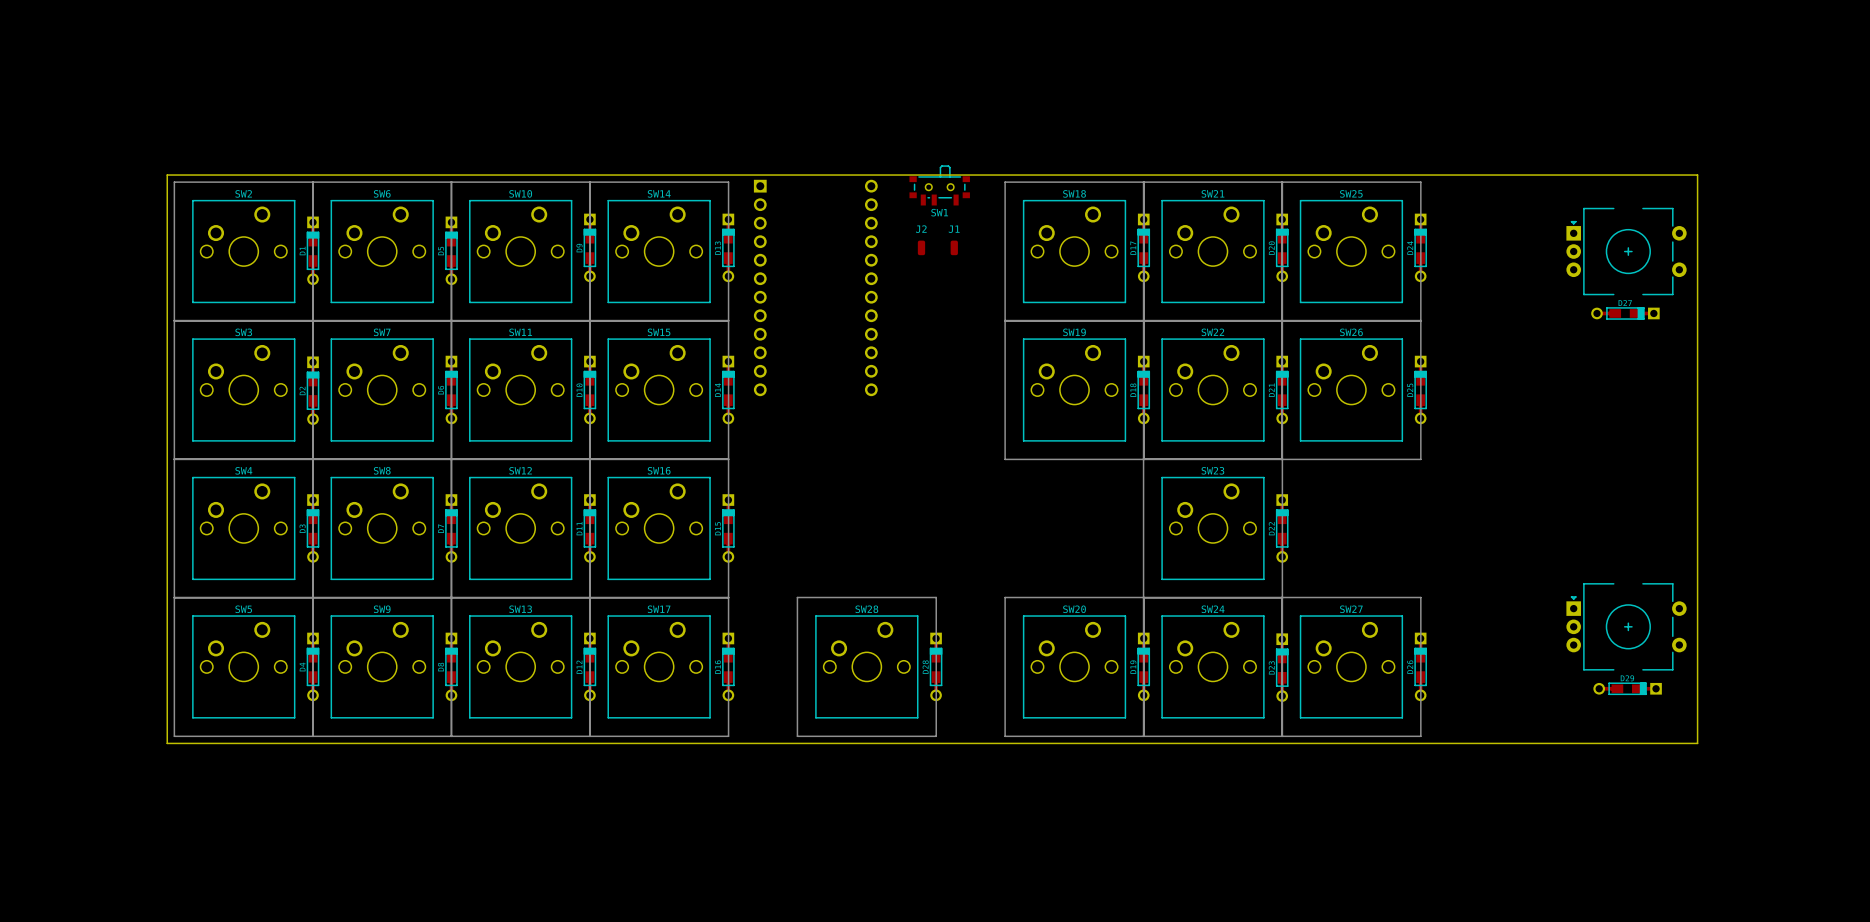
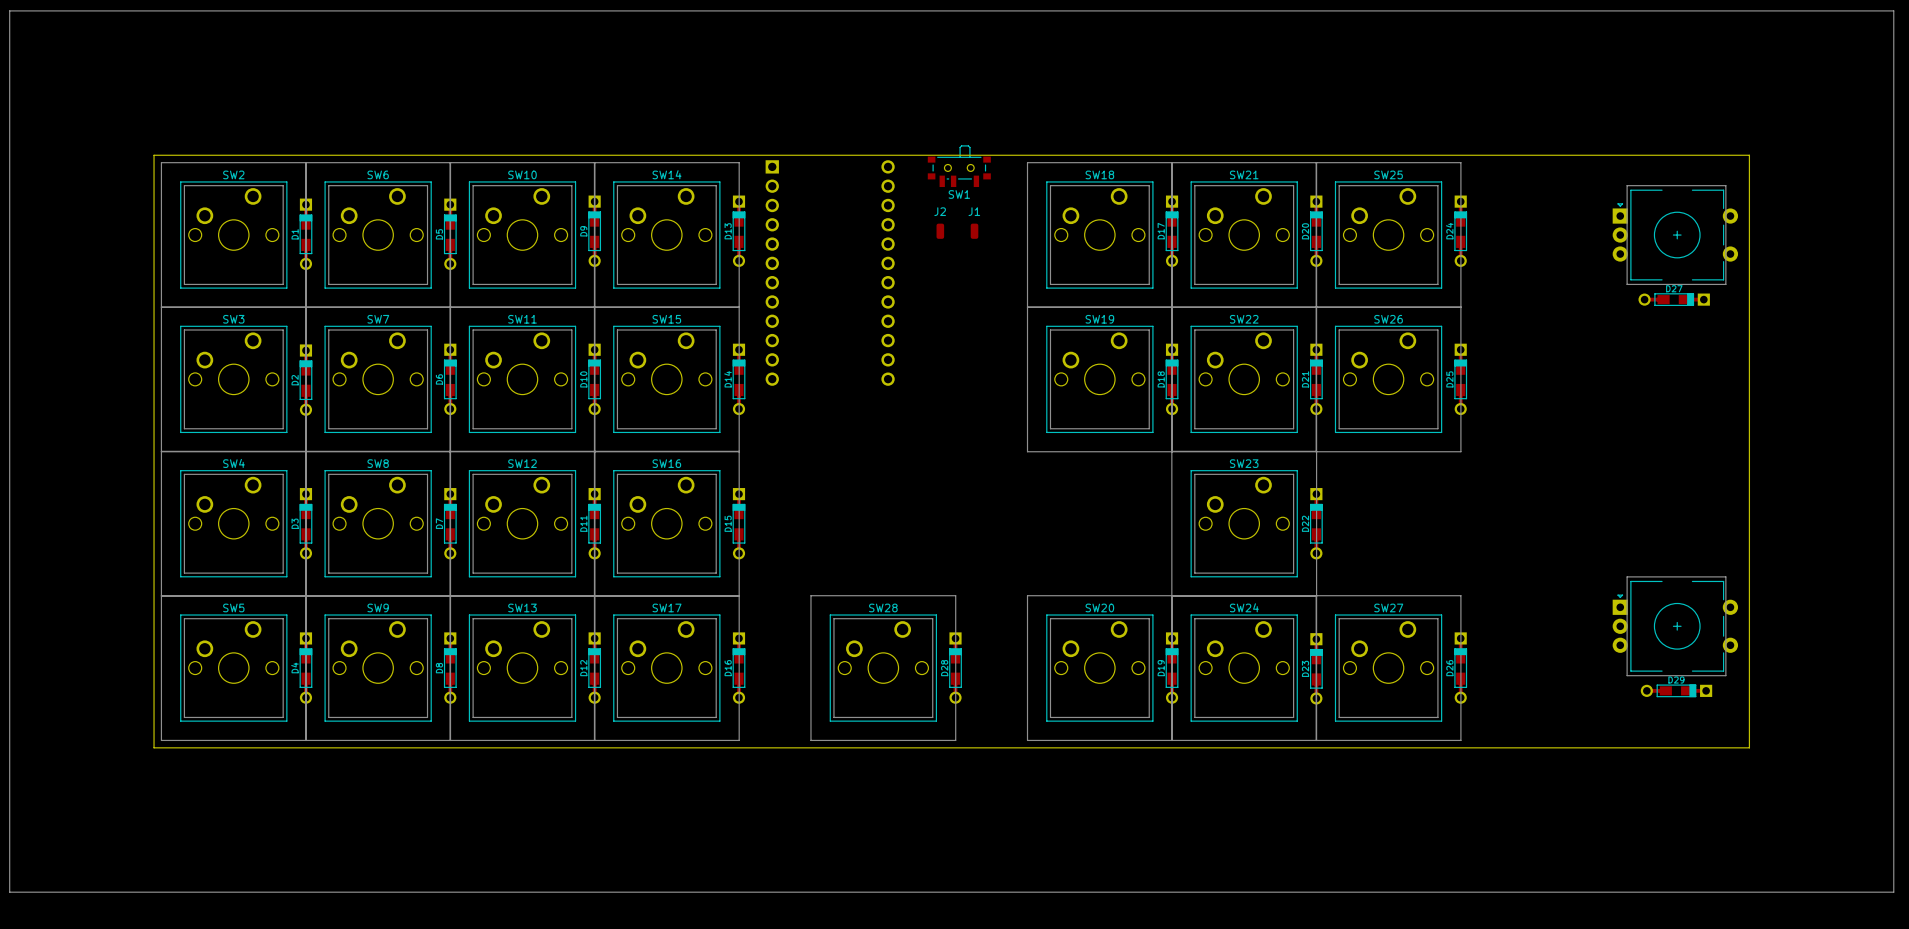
line: none -> (9, 10) (1893, 10) (1893, 892) (9, 892) (9, 10)
line: none -> (184, 185) (283, 185) (283, 284) (184, 284) (184, 185)
line: none -> (328, 185) (427, 185) (427, 284) (328, 284) (328, 185)
line: none -> (473, 185) (473, 284) (571, 284) (571, 185) (473, 185)
line: none -> (617, 185) (716, 185) (716, 284) (617, 284) (617, 185)
line: none -> (1050, 185) (1149, 185) (1149, 284) (1050, 284) (1050, 185)
line: none -> (1194, 185) (1293, 185) (1293, 284) (1194, 284) (1194, 185)
line: none -> (1339, 185) (1437, 185) (1437, 284) (1339, 284) (1339, 185)
line: none -> (1627, 185) (1725, 185) (1725, 284) (1627, 284) (1627, 185)
line: none -> (184, 330) (283, 330) (283, 428) (184, 428) (184, 330)
line: none -> (328, 330) (427, 330) (427, 428) (328, 428) (328, 330)
line: none -> (473, 330) (473, 428) (571, 428) (571, 330) (473, 330)
line: none -> (617, 330) (617, 428) (716, 428) (716, 330) (617, 330)
line: none -> (1050, 330) (1149, 330) (1149, 428) (1050, 428) (1050, 330)
line: none -> (1194, 330) (1293, 330) (1293, 428) (1194, 428) (1194, 330)
line: none -> (1339, 330) (1437, 330) (1437, 428) (1339, 428) (1339, 330)
line: none -> (184, 474) (184, 573) (283, 573) (283, 474) (184, 474)
line: none -> (328, 474) (427, 474) (427, 573) (328, 573) (328, 474)
line: none -> (473, 474) (473, 573) (571, 573) (571, 474) (473, 474)
line: none -> (617, 474) (617, 573) (716, 573) (716, 474) (617, 474)
line: none -> (1194, 474) (1293, 474) (1293, 573) (1194, 573) (1194, 474)
line: none -> (1627, 576) (1627, 675) (1725, 675) (1725, 576) (1627, 576)
line: none -> (184, 618) (283, 618) (283, 717) (184, 717) (184, 618)
line: none -> (328, 618) (427, 618) (427, 717) (328, 717) (328, 618)
line: none -> (473, 618) (571, 618) (571, 717) (473, 717) (473, 618)
line: none -> (617, 618) (716, 618) (716, 717) (617, 717) (617, 618)
line: none -> (833, 618) (932, 618) (932, 717) (833, 717) (833, 618)
line: none -> (1050, 618) (1149, 618) (1149, 717) (1050, 717) (1050, 618)
line: none -> (1194, 618) (1293, 618) (1293, 717) (1194, 717) (1194, 618)
line: none -> (1339, 618) (1437, 618) (1437, 717) (1339, 717) (1339, 618)

